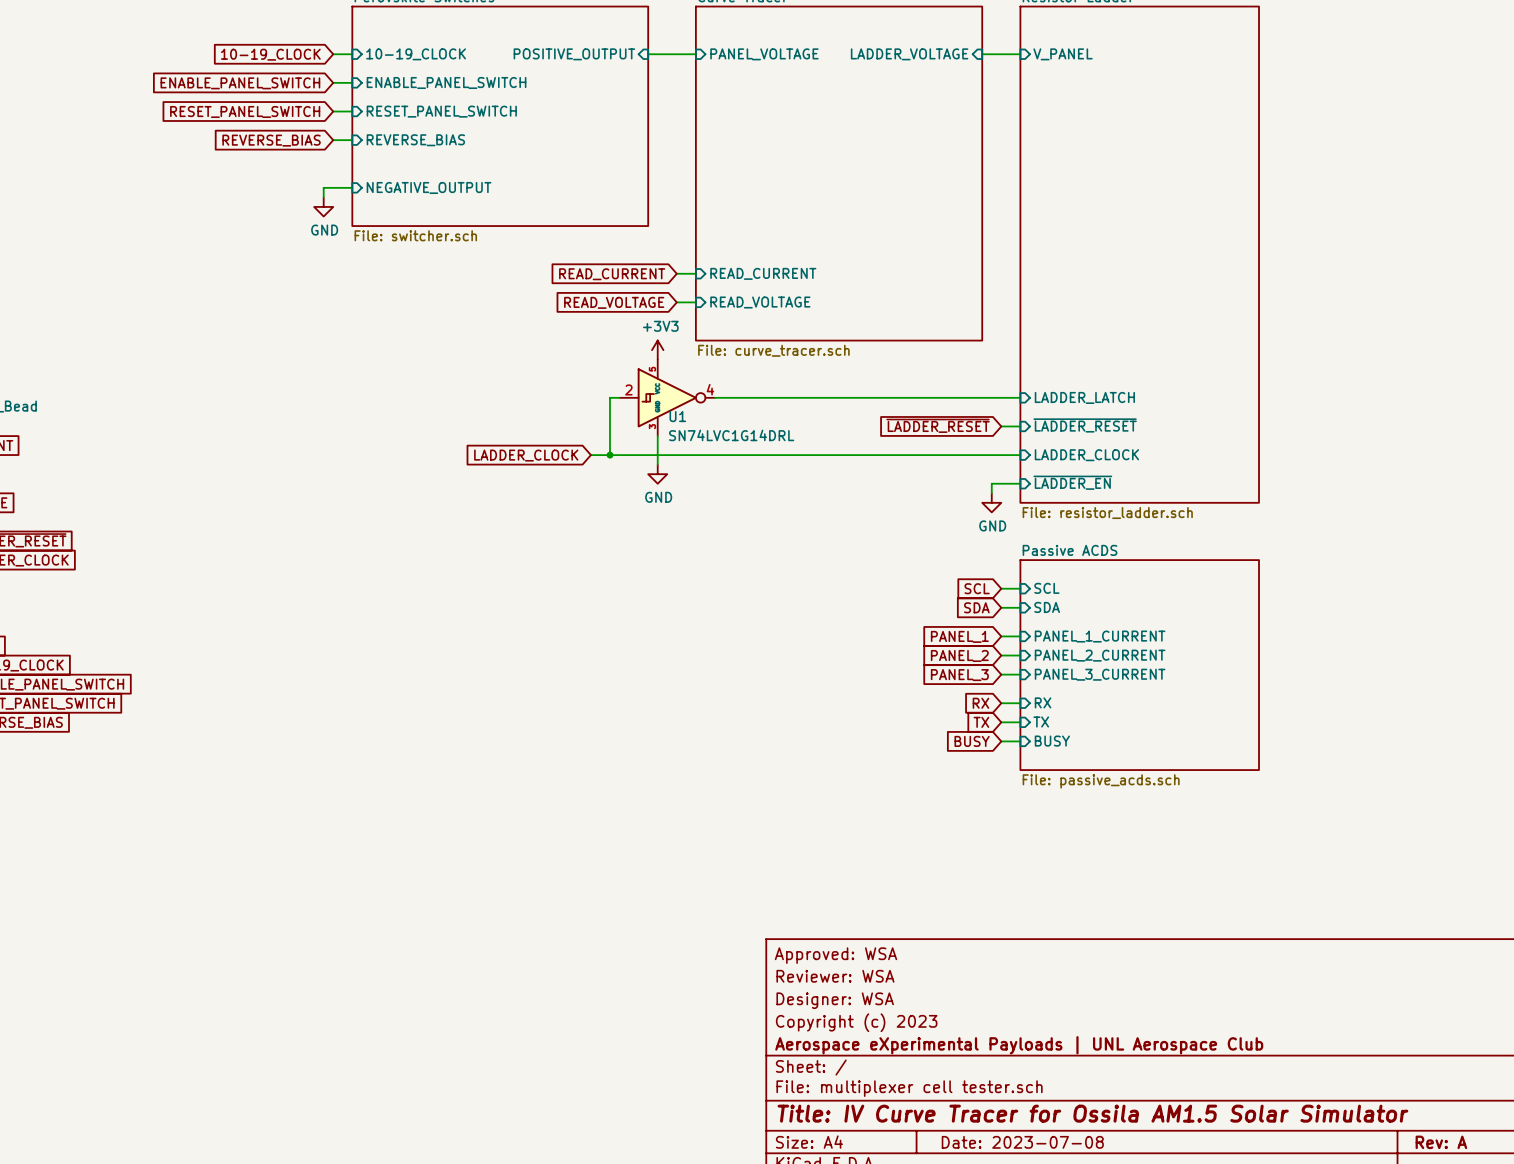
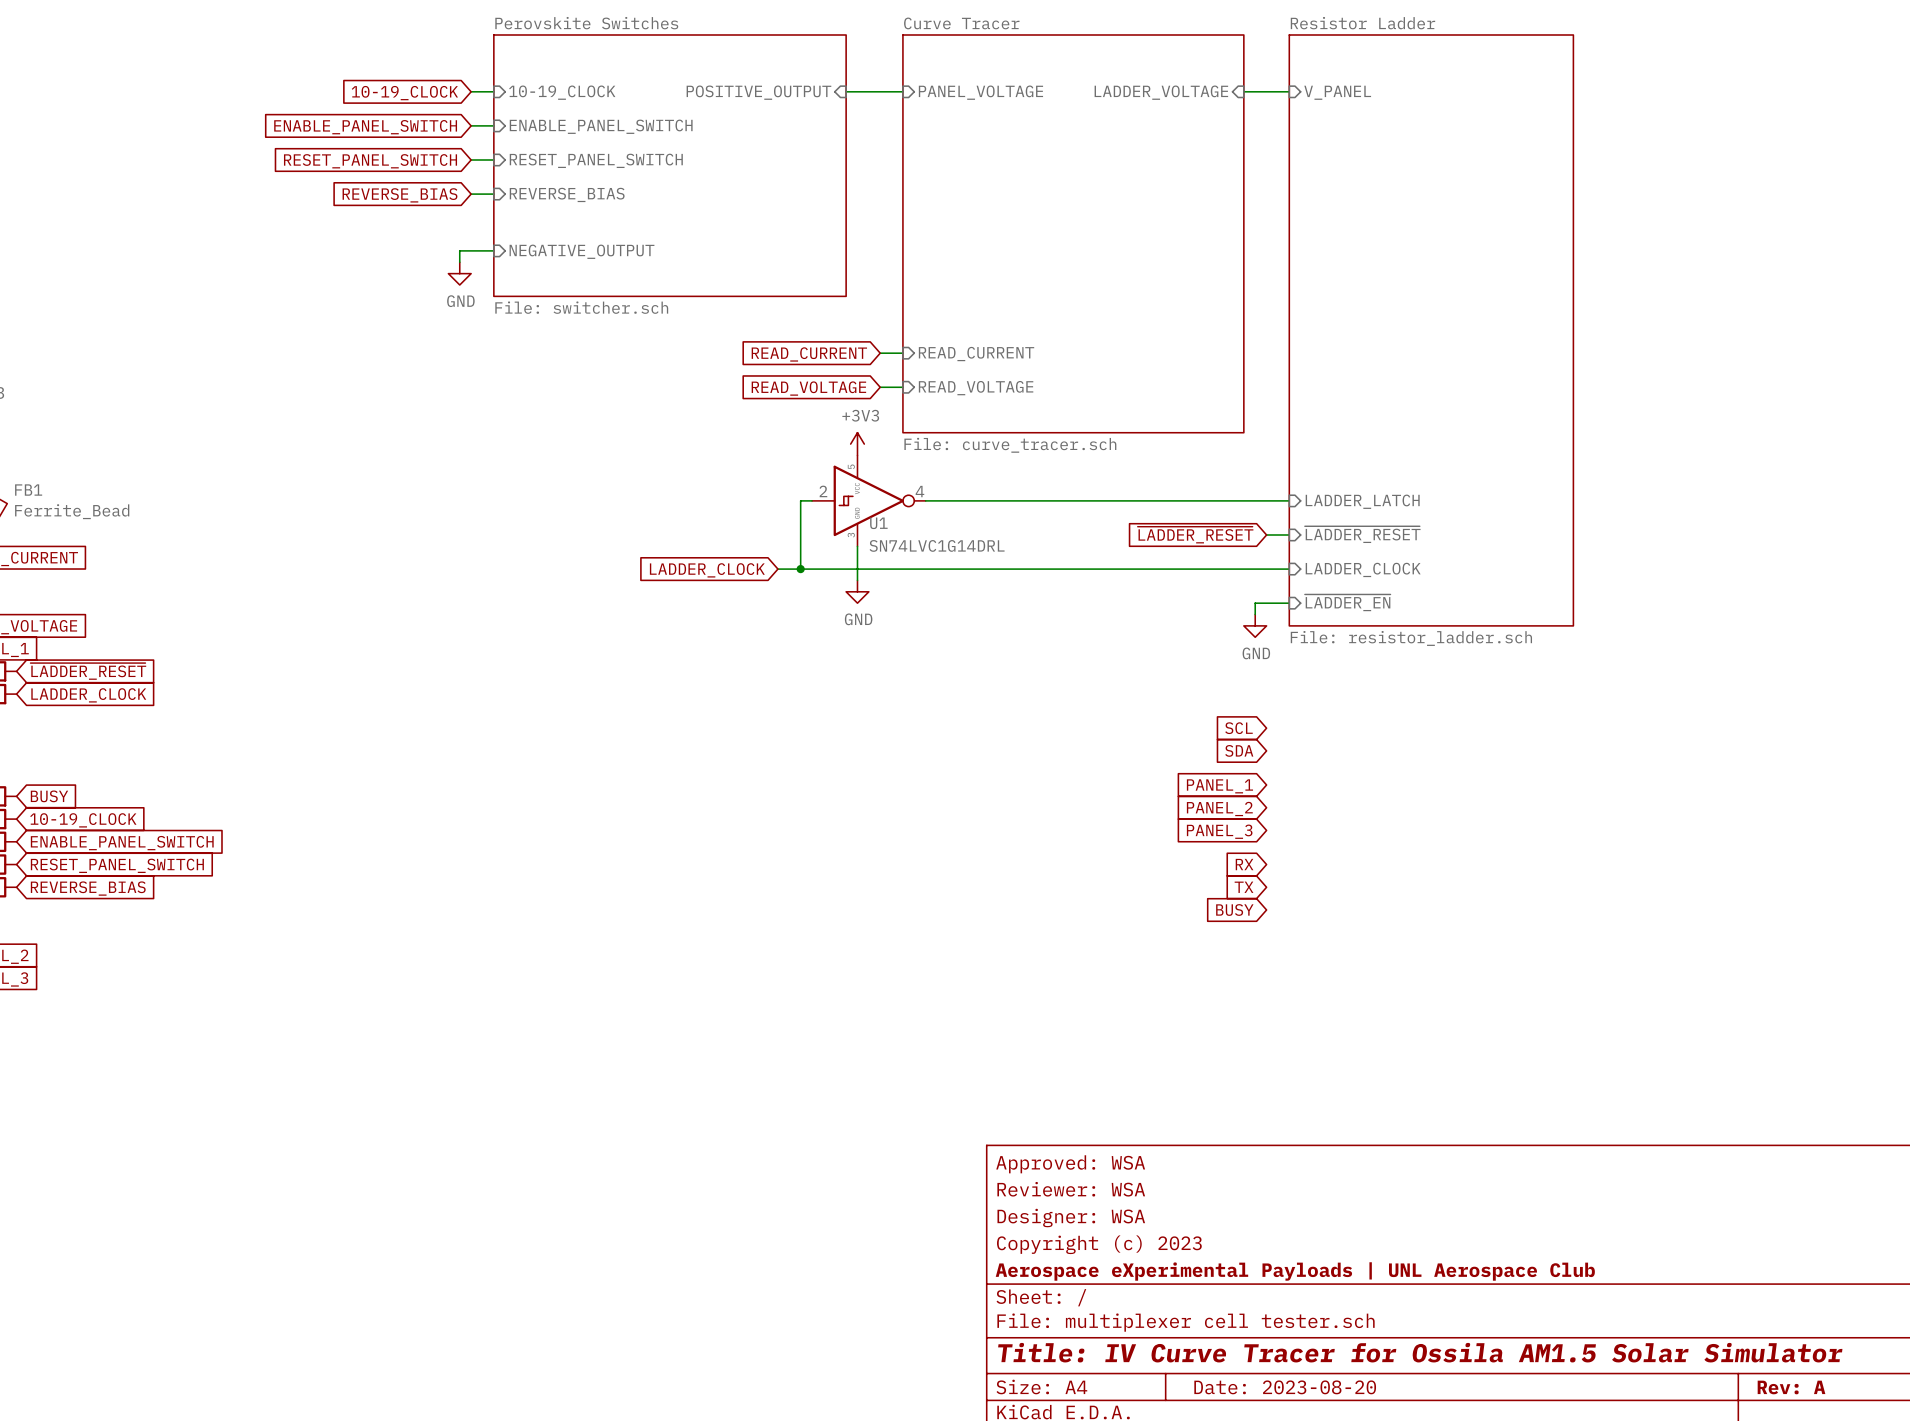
wire: (1001, 588) (1020, 588) -> none
sheet pin: SCL (1046, 588) -> none
wire: (1001, 607) (1020, 607) -> none
sheet pin: SDA (1047, 607) -> none
wire: (1001, 636) (1020, 636) -> none
sheet pin: PANEL_1_CURRENT (1100, 636) -> none
wire: (1001, 655) (1020, 655) -> none
sheet pin: PANEL_2_CURRENT (1100, 655) -> none
sheet Passive ACDS: File: passive_acds.sch (1139, 665) -> none
wire: (1001, 674) (1020, 674) -> none
sheet pin: PANEL_3_CURRENT (1100, 674) -> none
sheet pin: RX (1043, 702) -> none
wire: (1001, 703) (1020, 703) -> none
sheet pin: TX (1041, 721) -> none
wire: (1001, 722) (1020, 722) -> none
wire: (1001, 741) (1020, 741) -> none
sheet pin: BUSY (1052, 741) -> none
title block: Date: 2023-07-08 (1022, 1142) -> Date: 2023-08-20 (1285, 1387)

